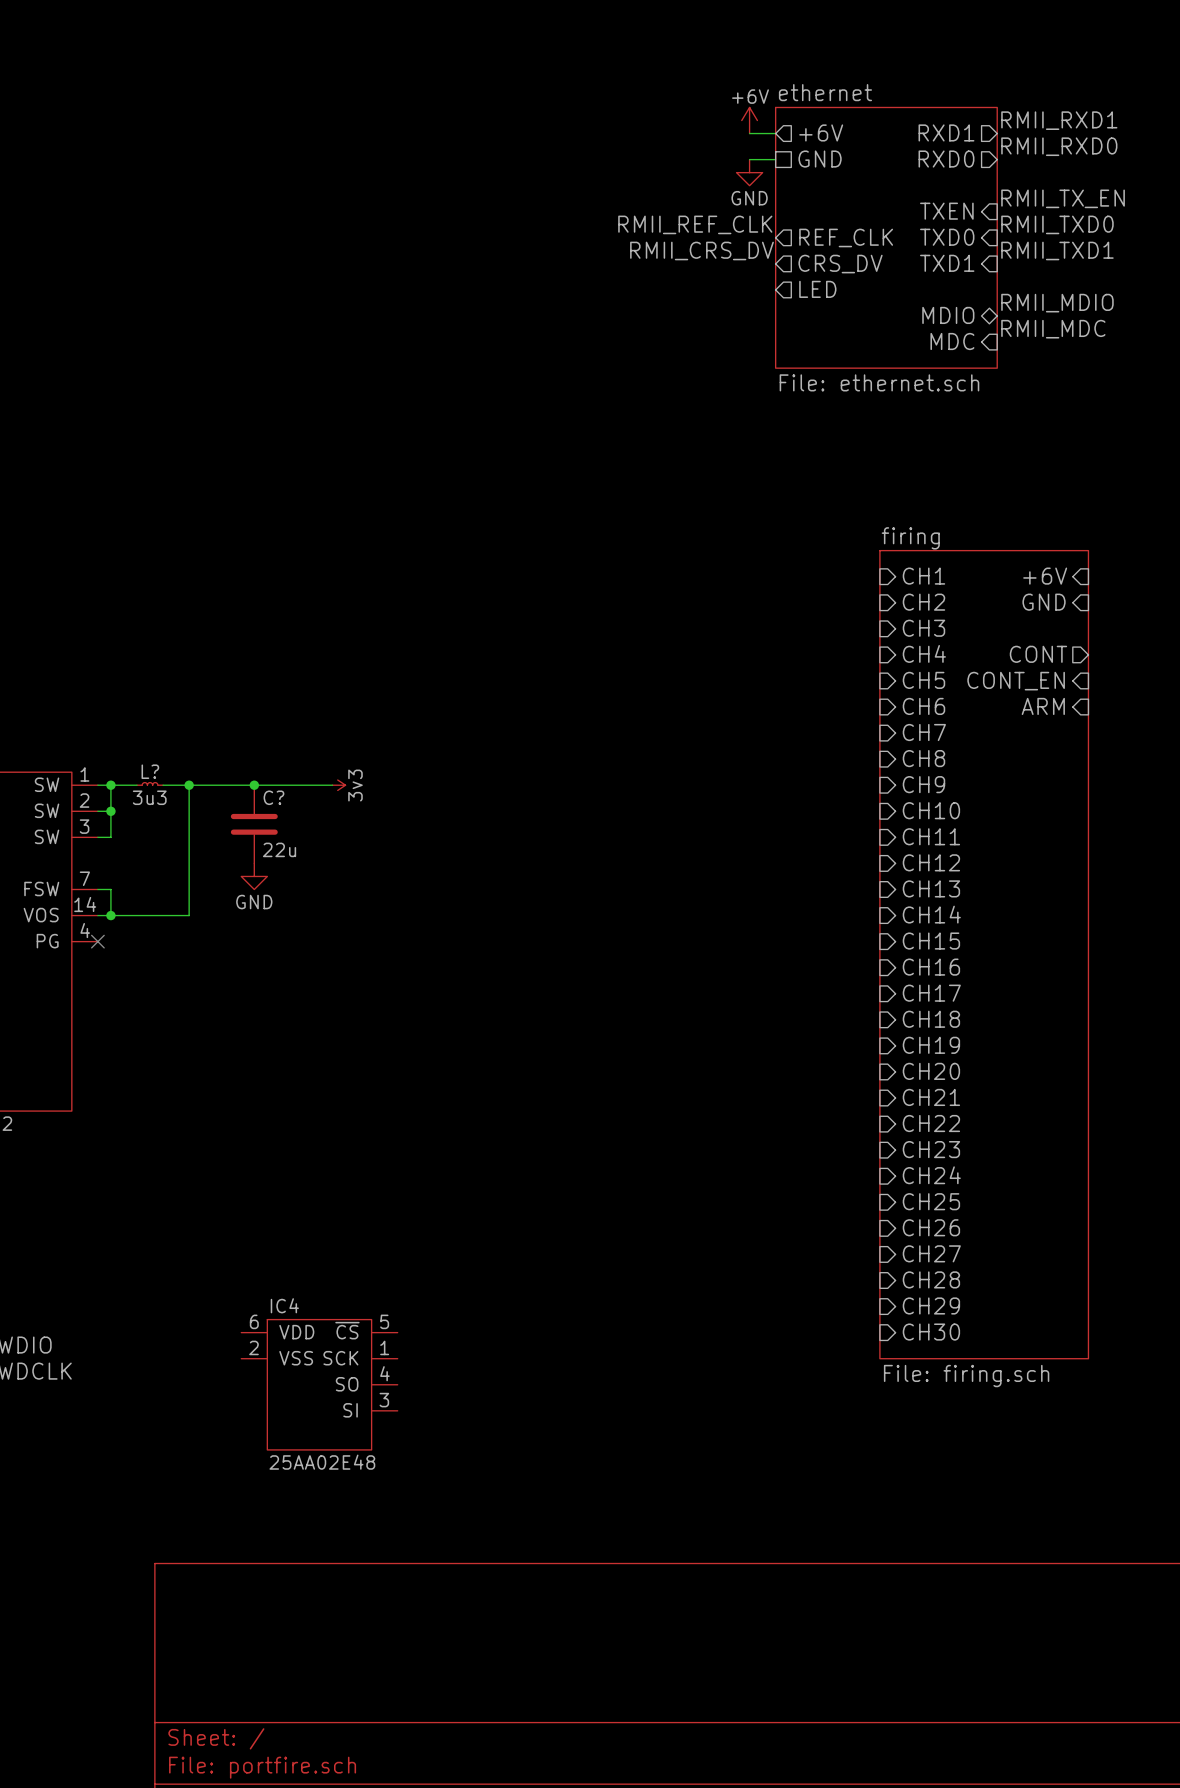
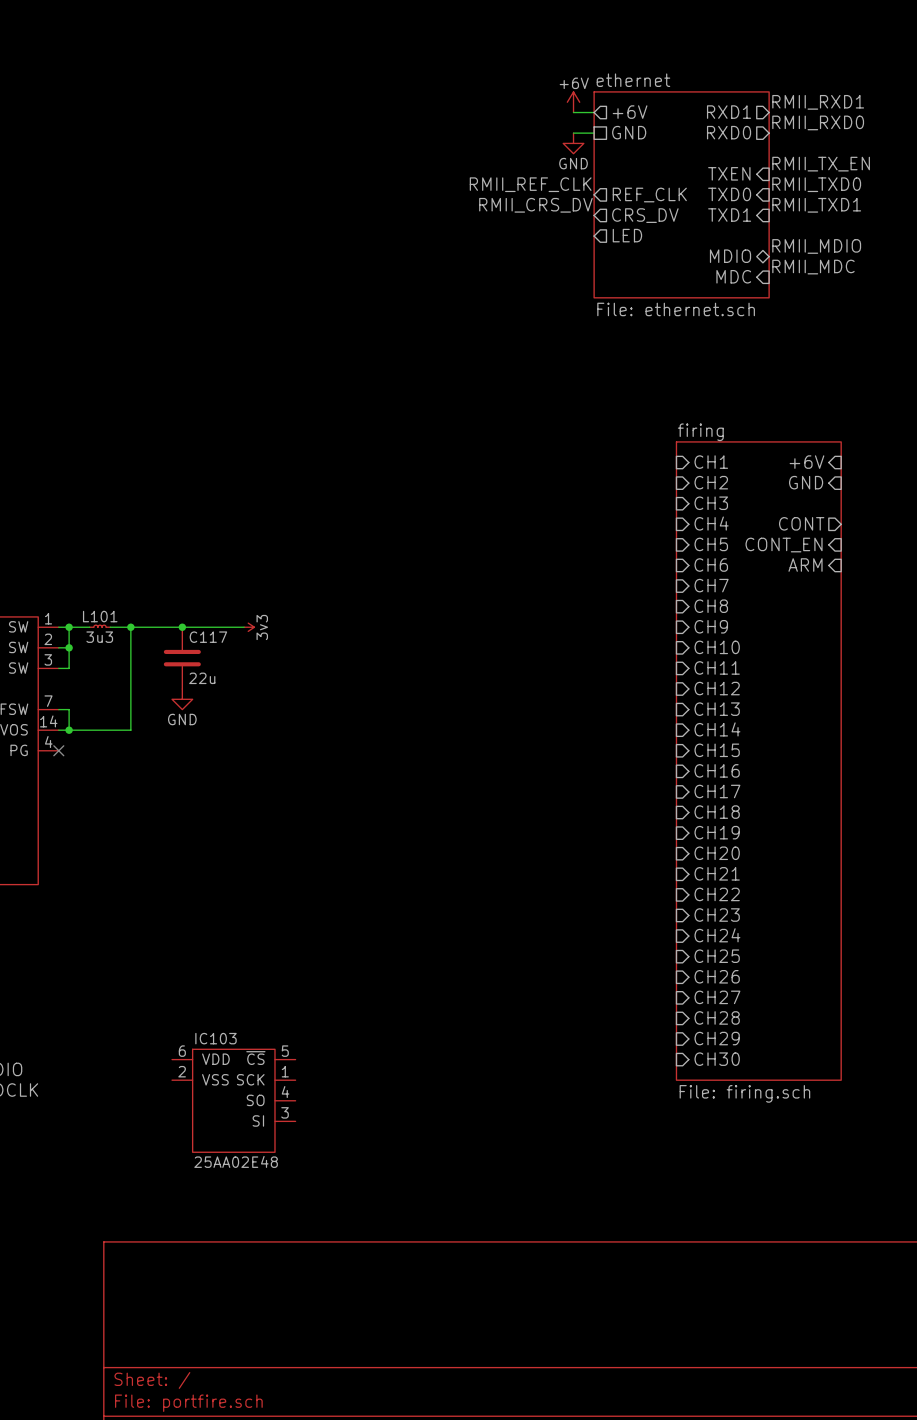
L? name: L? (150, 771) -> L101 (100, 616)
C? name: C? (273, 797) -> C117 (208, 637)
IC4 name: IC4 (284, 1305) -> IC103 (216, 1038)

